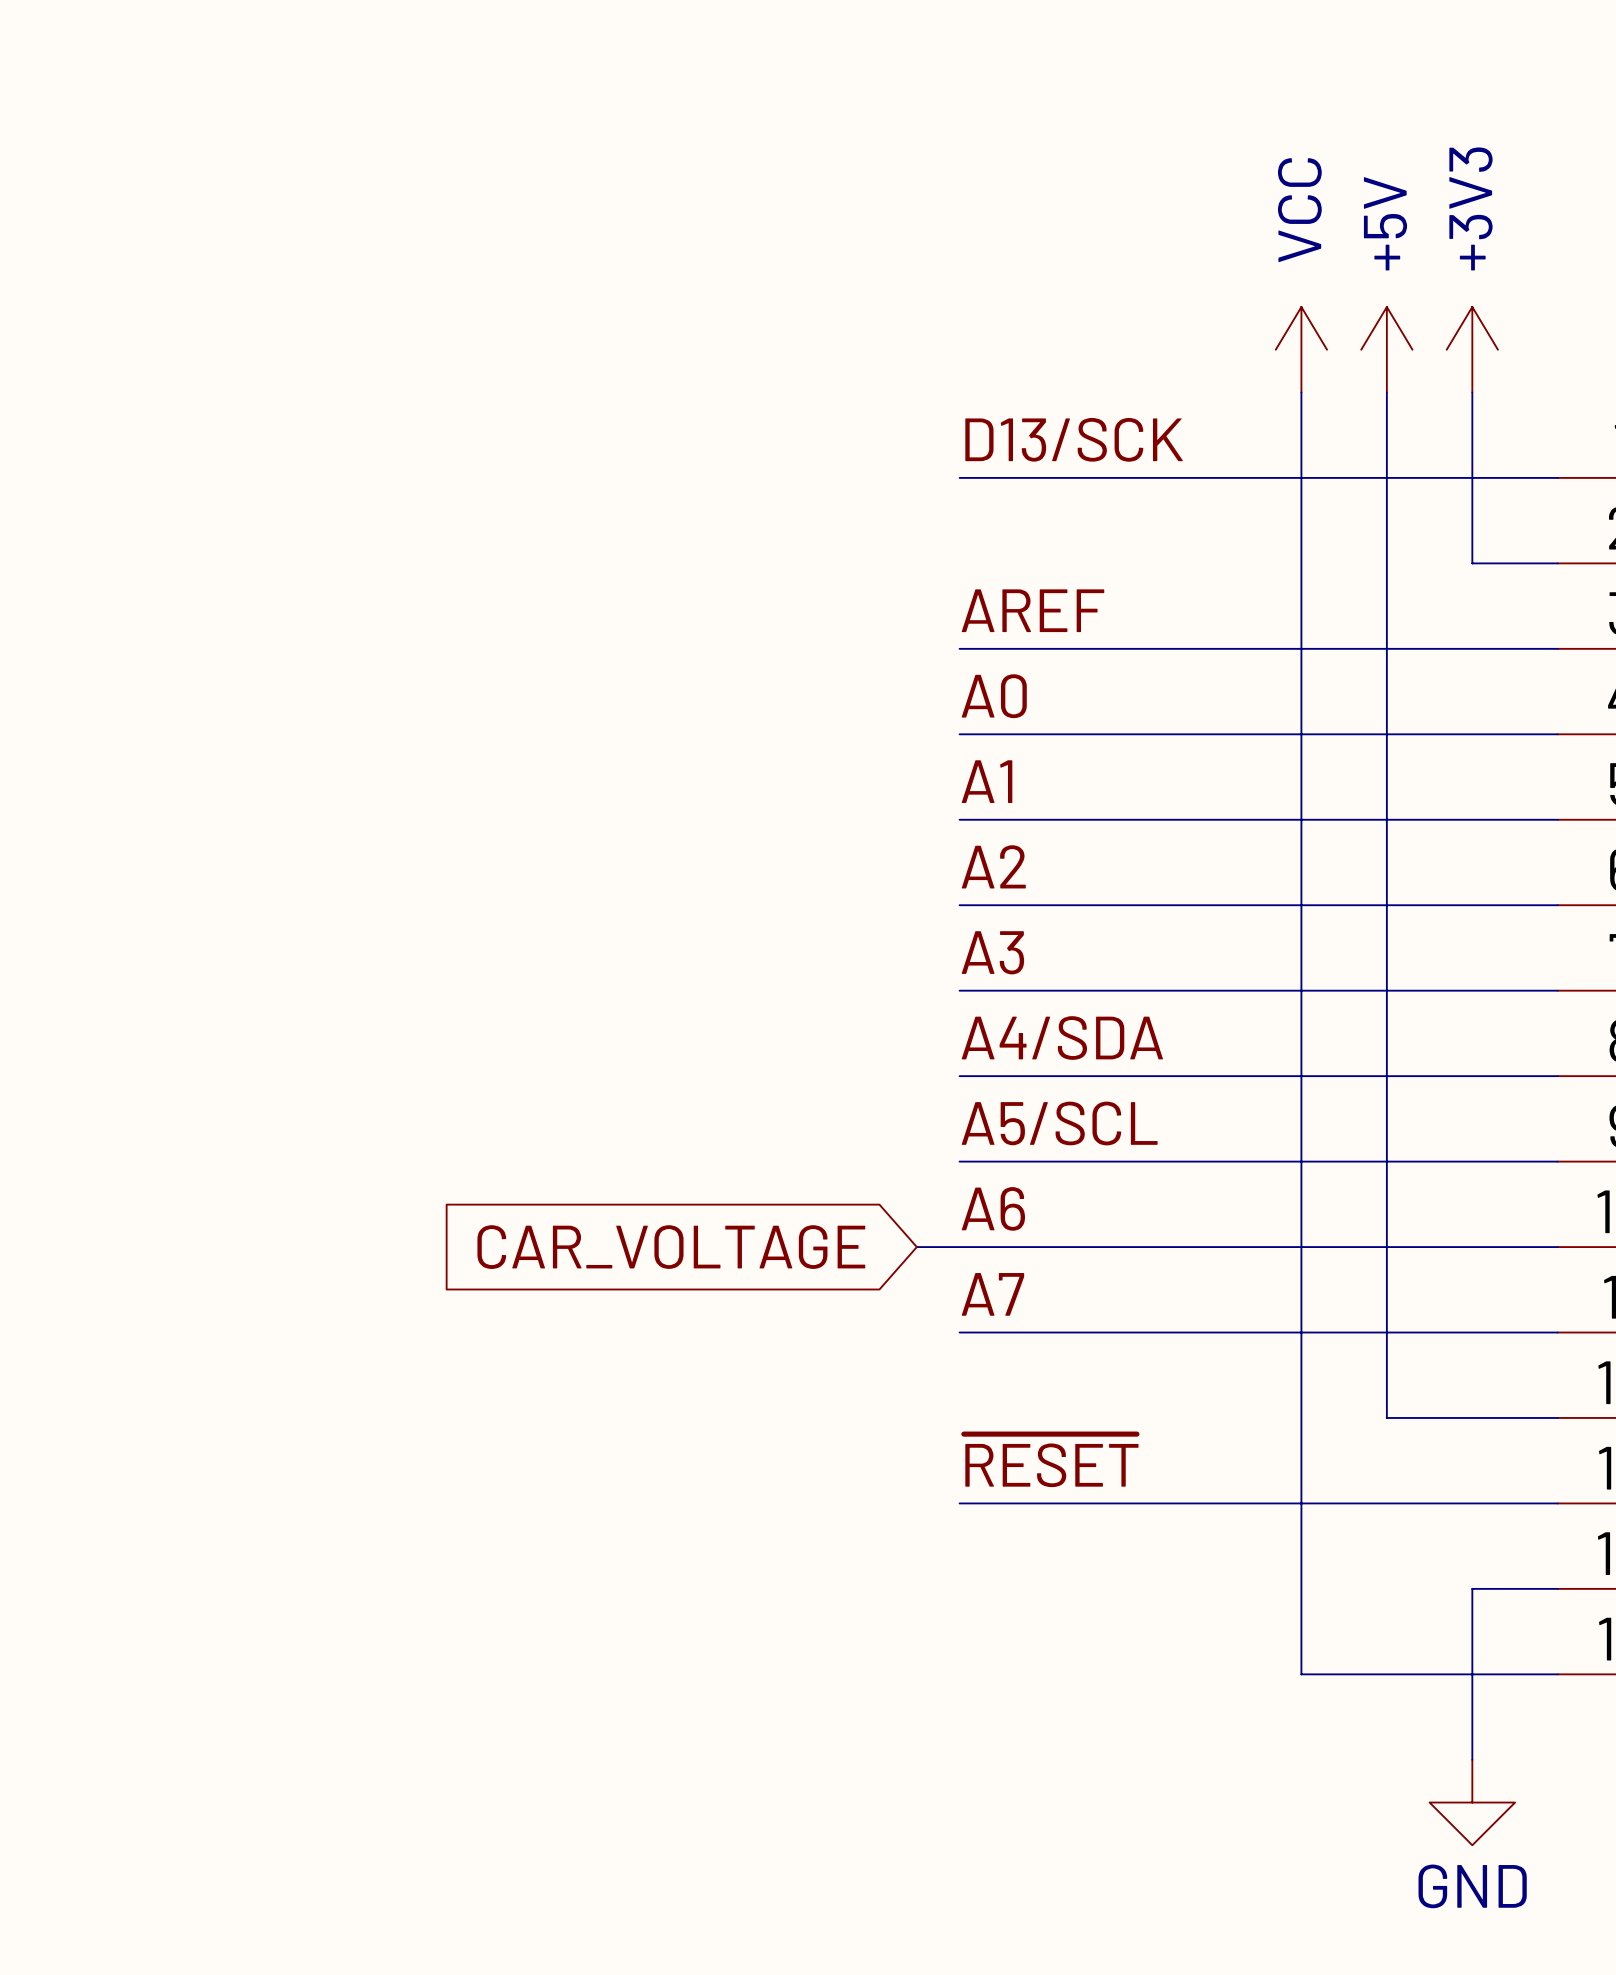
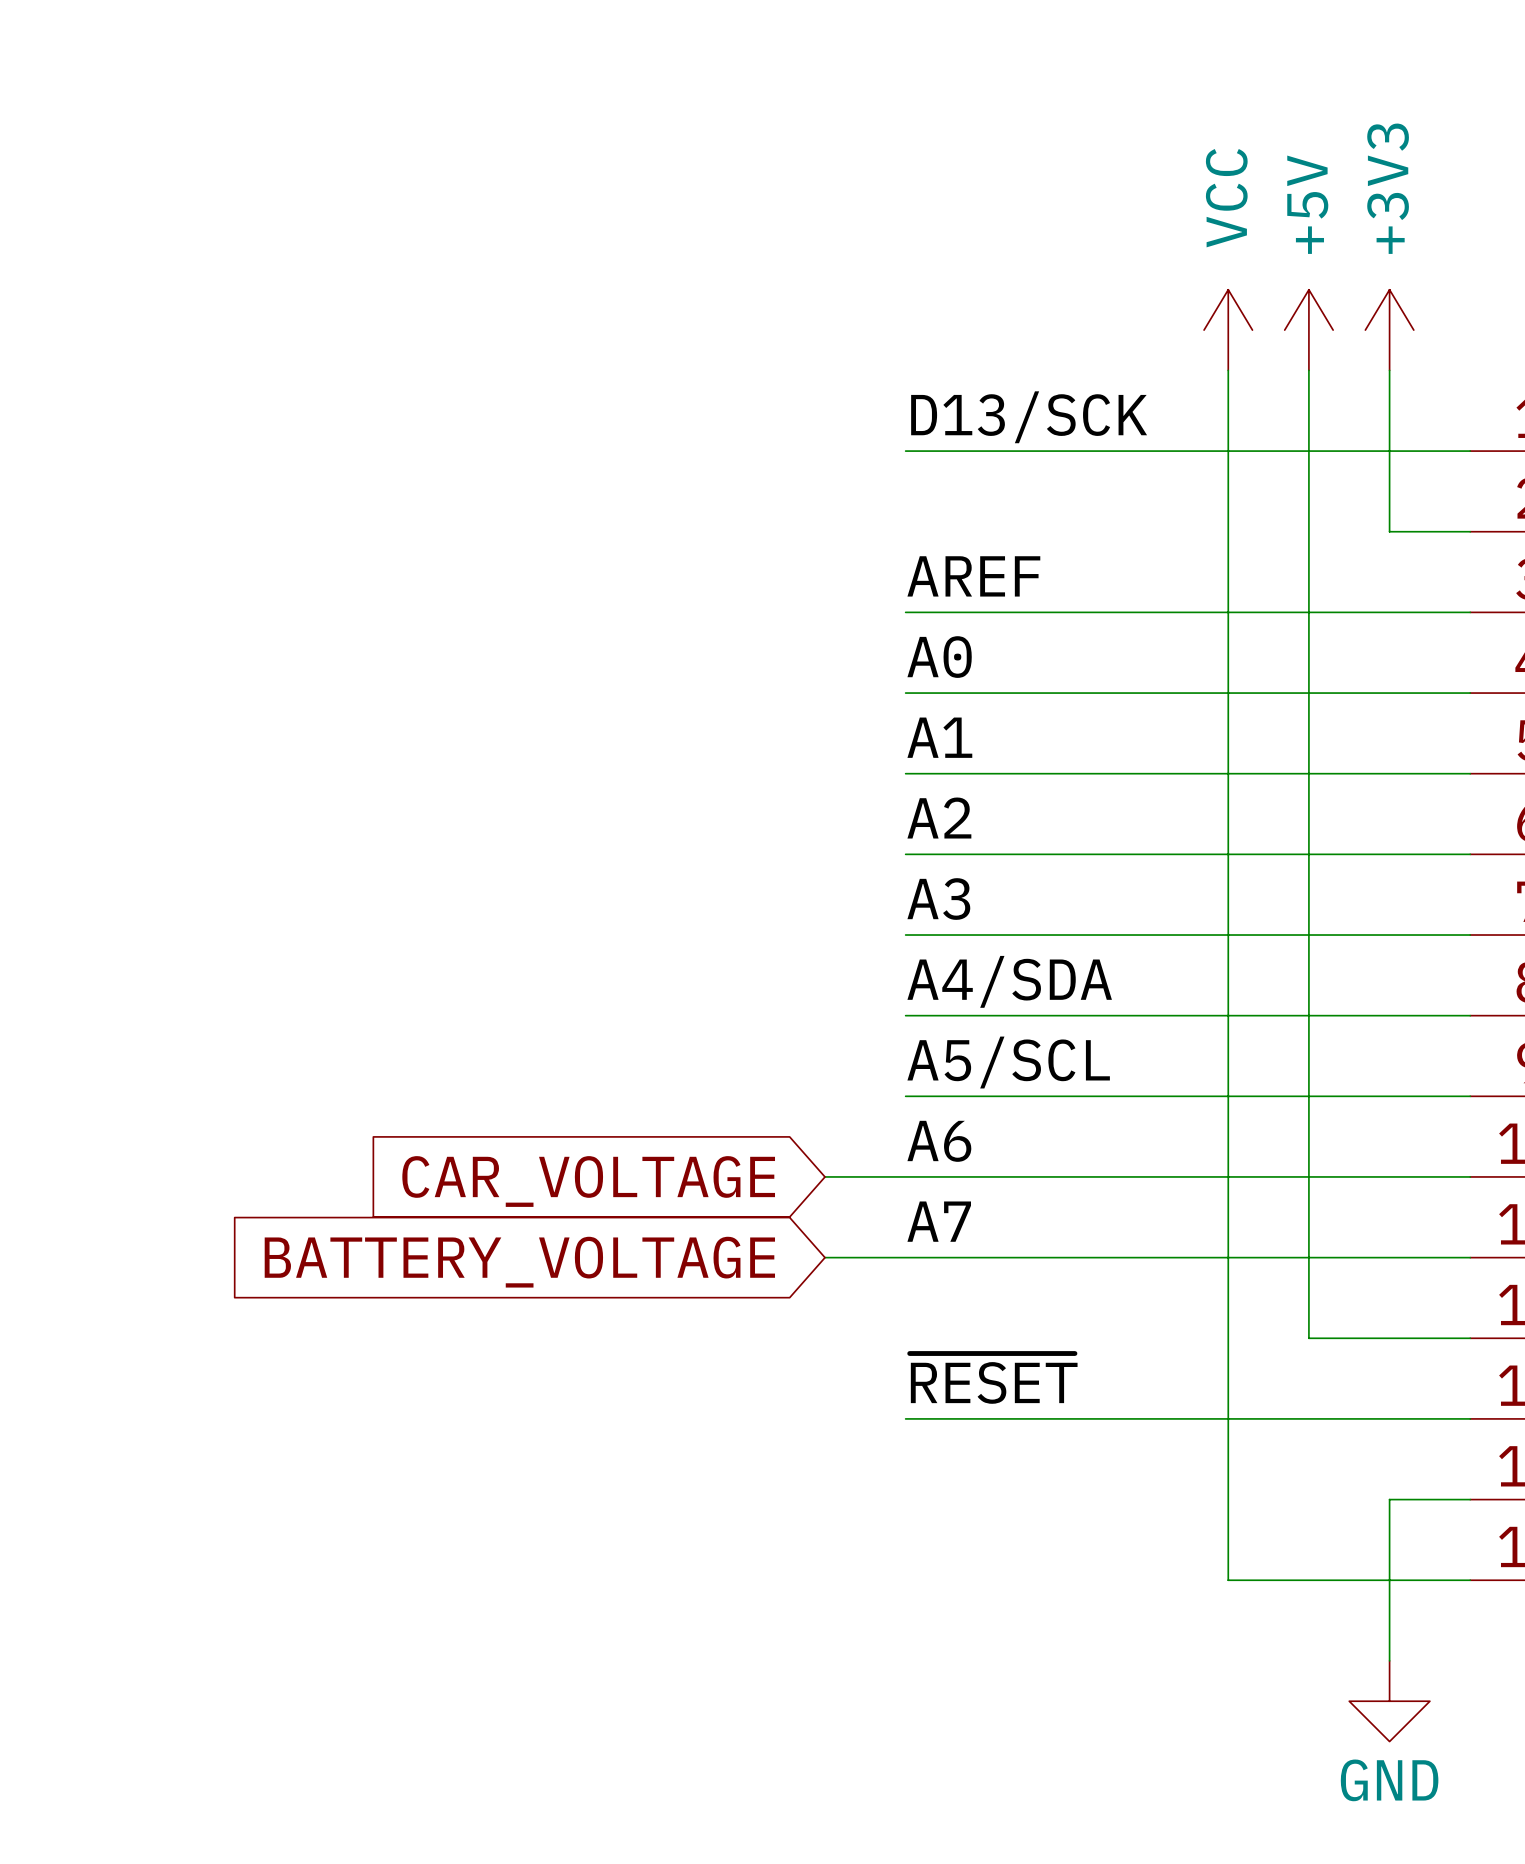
global label position: CAR_VOLTAGE (671, 1247) -> CAR_VOLTAGE (588, 1181)
wire: none -> (825, 1176) (865, 1176)
global label: none -> BATTERY_VOLTAGE (519, 1262)
wire: none -> (825, 1257) (905, 1257)

